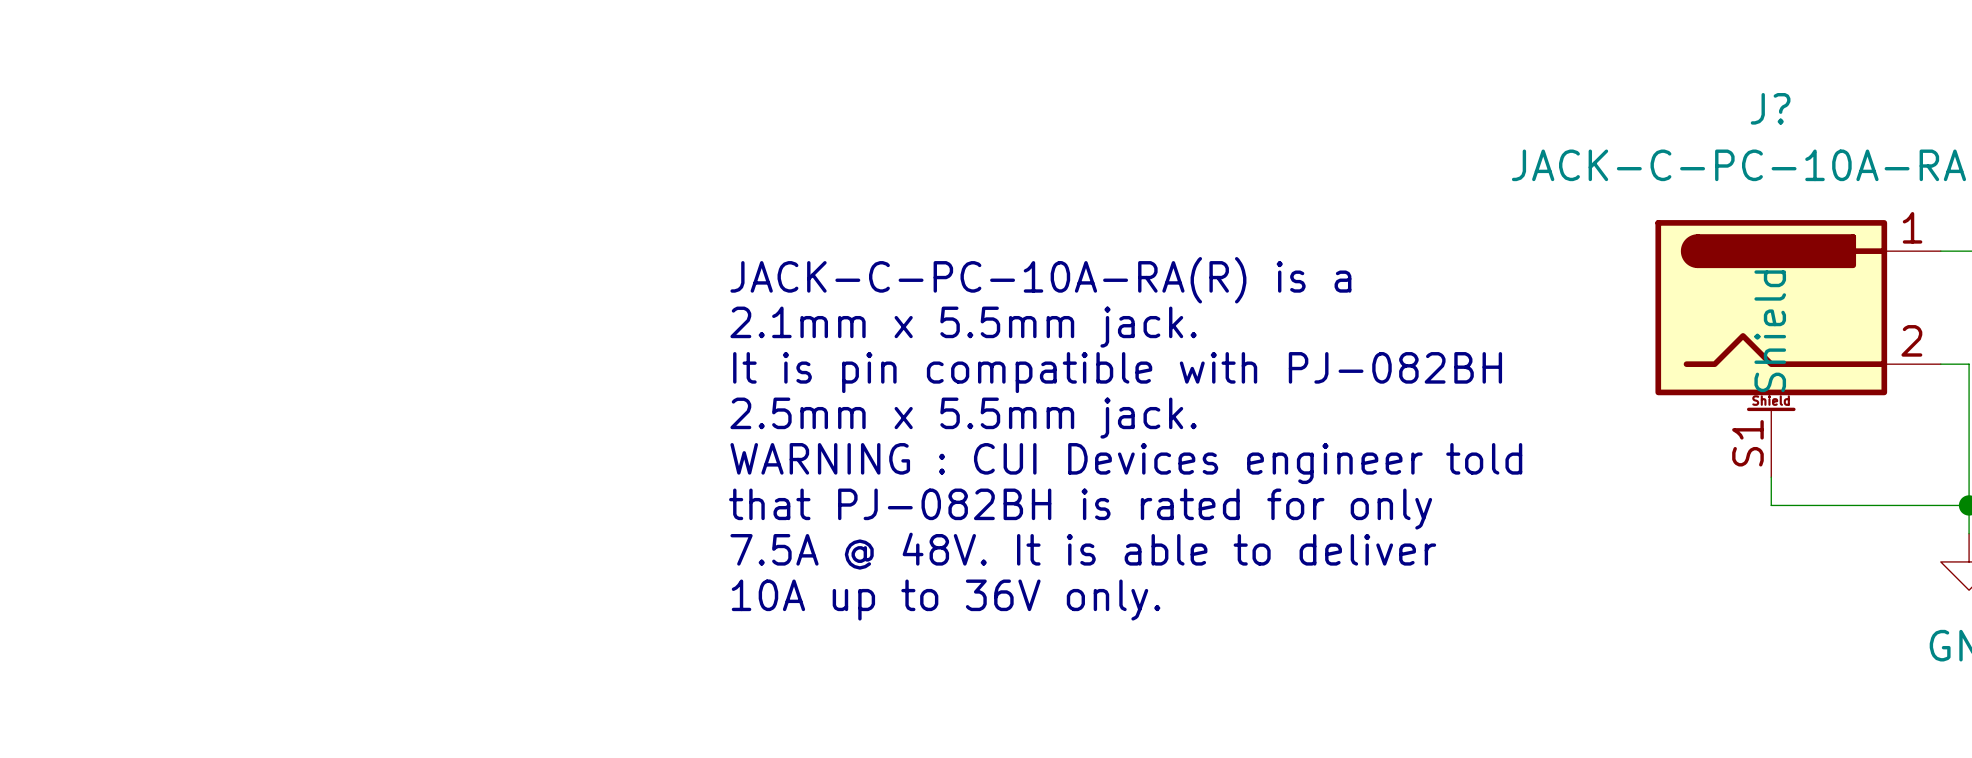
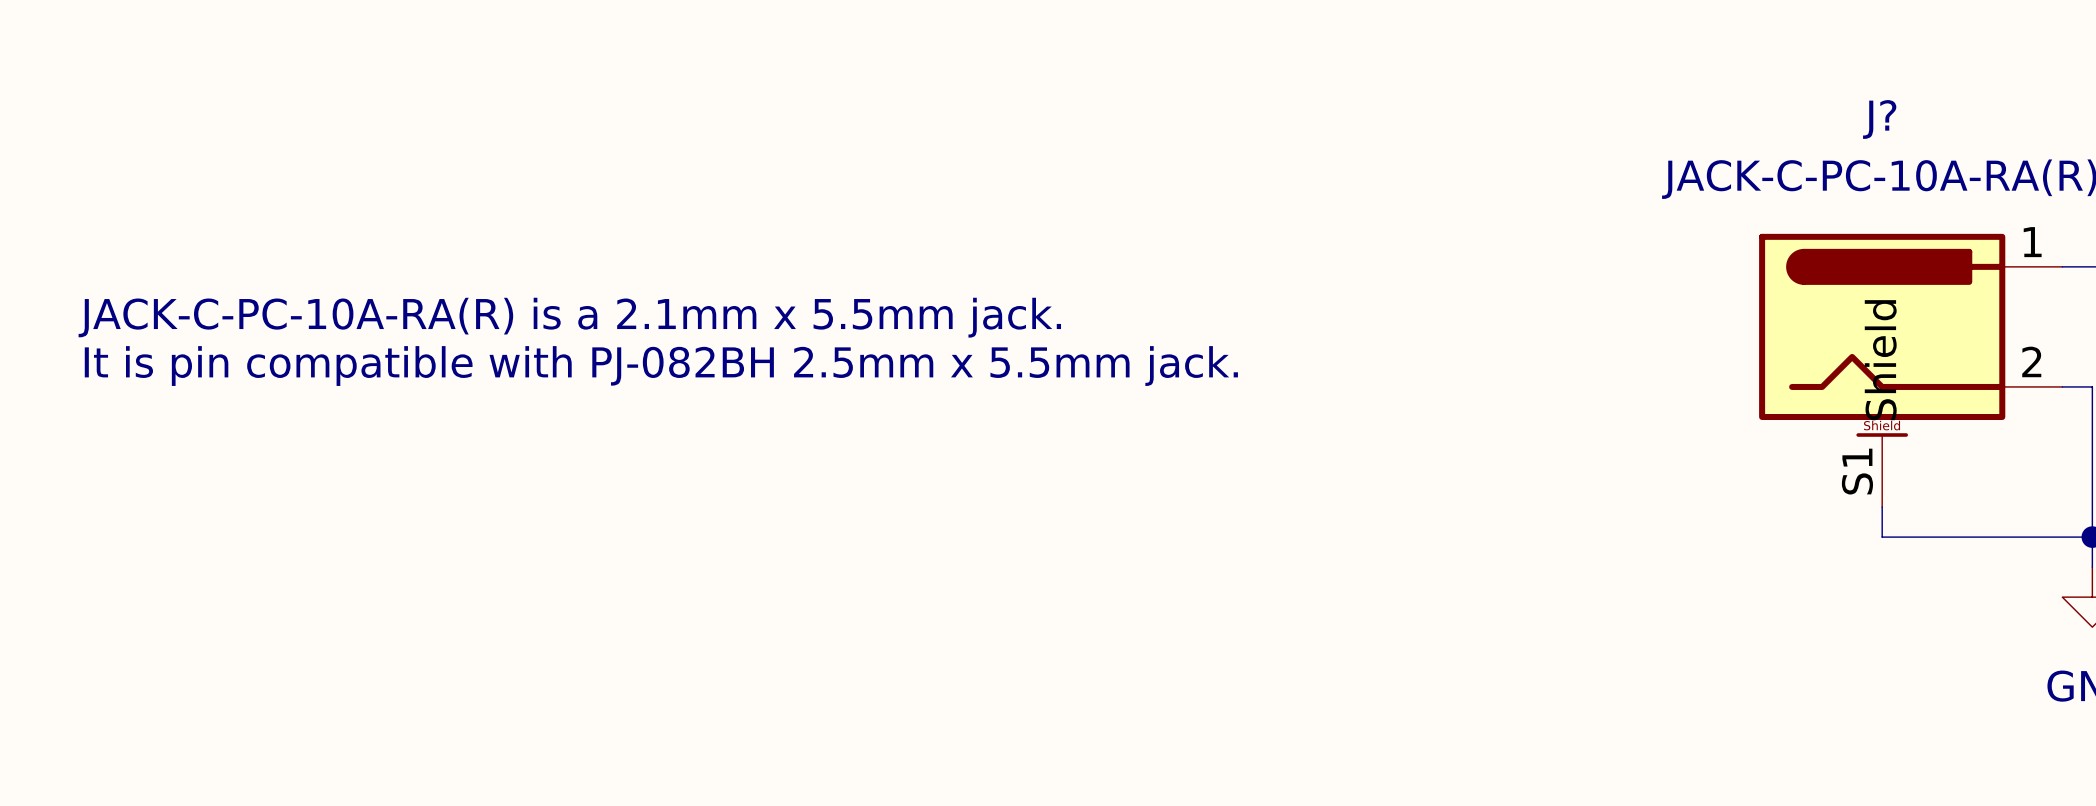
text: JACK-C-PC-10A-RA(R) is a (1040, 280) -> none
text: none -> JACK-C-PC-10A-RA(R) is a 2.1mm x 5.5mm jack. (569, 317)
text: 2.1mm x 5.5mm jack. (963, 327) -> none
text: none -> It is pin compatible with PJ-082BH 2.5mm x 5.5mm jack. (661, 366)
text: It is pin compatible with PJ-082BH (1117, 372) -> none
text: 2.5mm x 5.5mm jack. (963, 418) -> none
text: WARNING : CUI Devices engineer told (1126, 463) -> none
text: that PJ-082BH is rated for only (1080, 509) -> none
text: 7.5A @ 48V. It is able to deliver (1083, 551) -> none
text: 10A up to 36V only. (946, 600) -> none

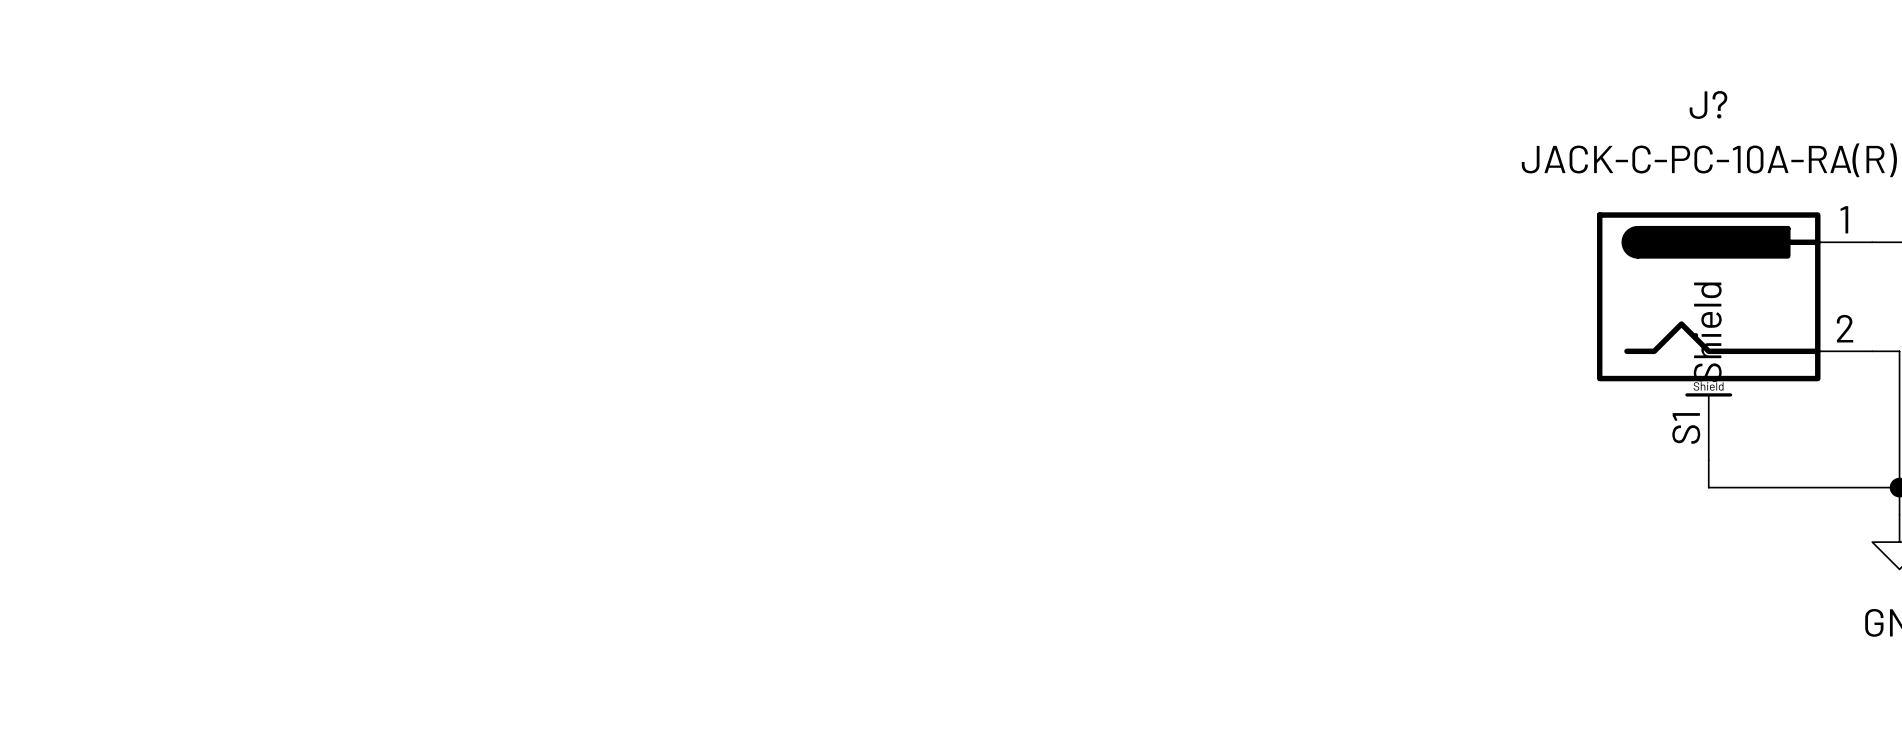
text: JACK-C-PC-10A-RA(R) is a 2.1mm x 5.5mm jack. (569, 317) -> none
text: It is pin compatible with PJ-082BH 2.5mm x 5.5mm jack. (661, 366) -> none

